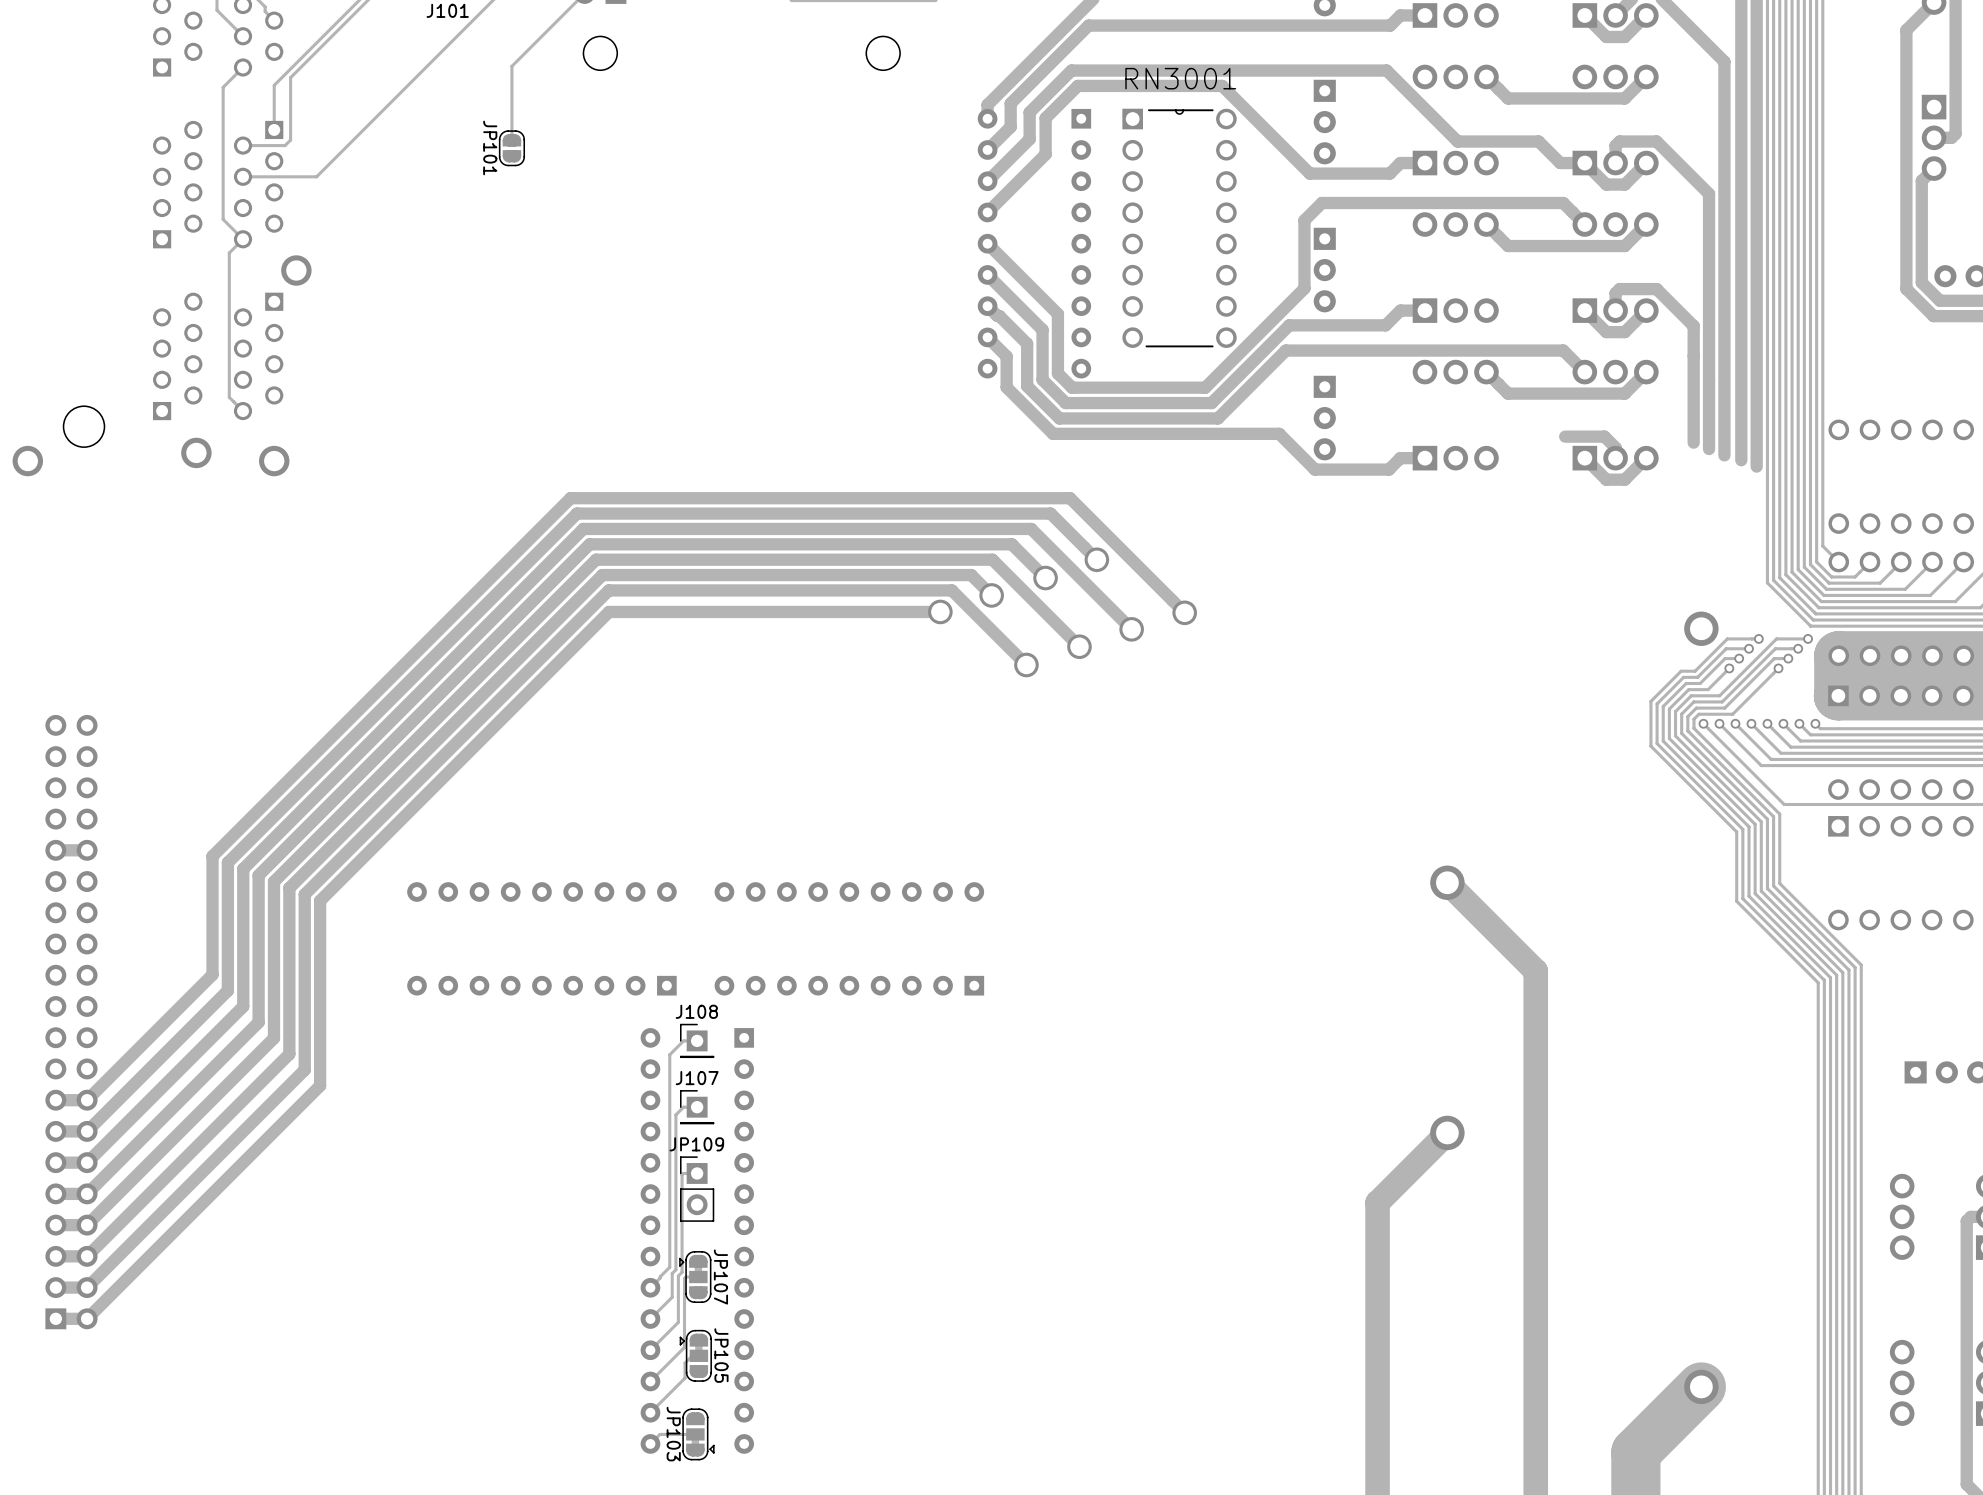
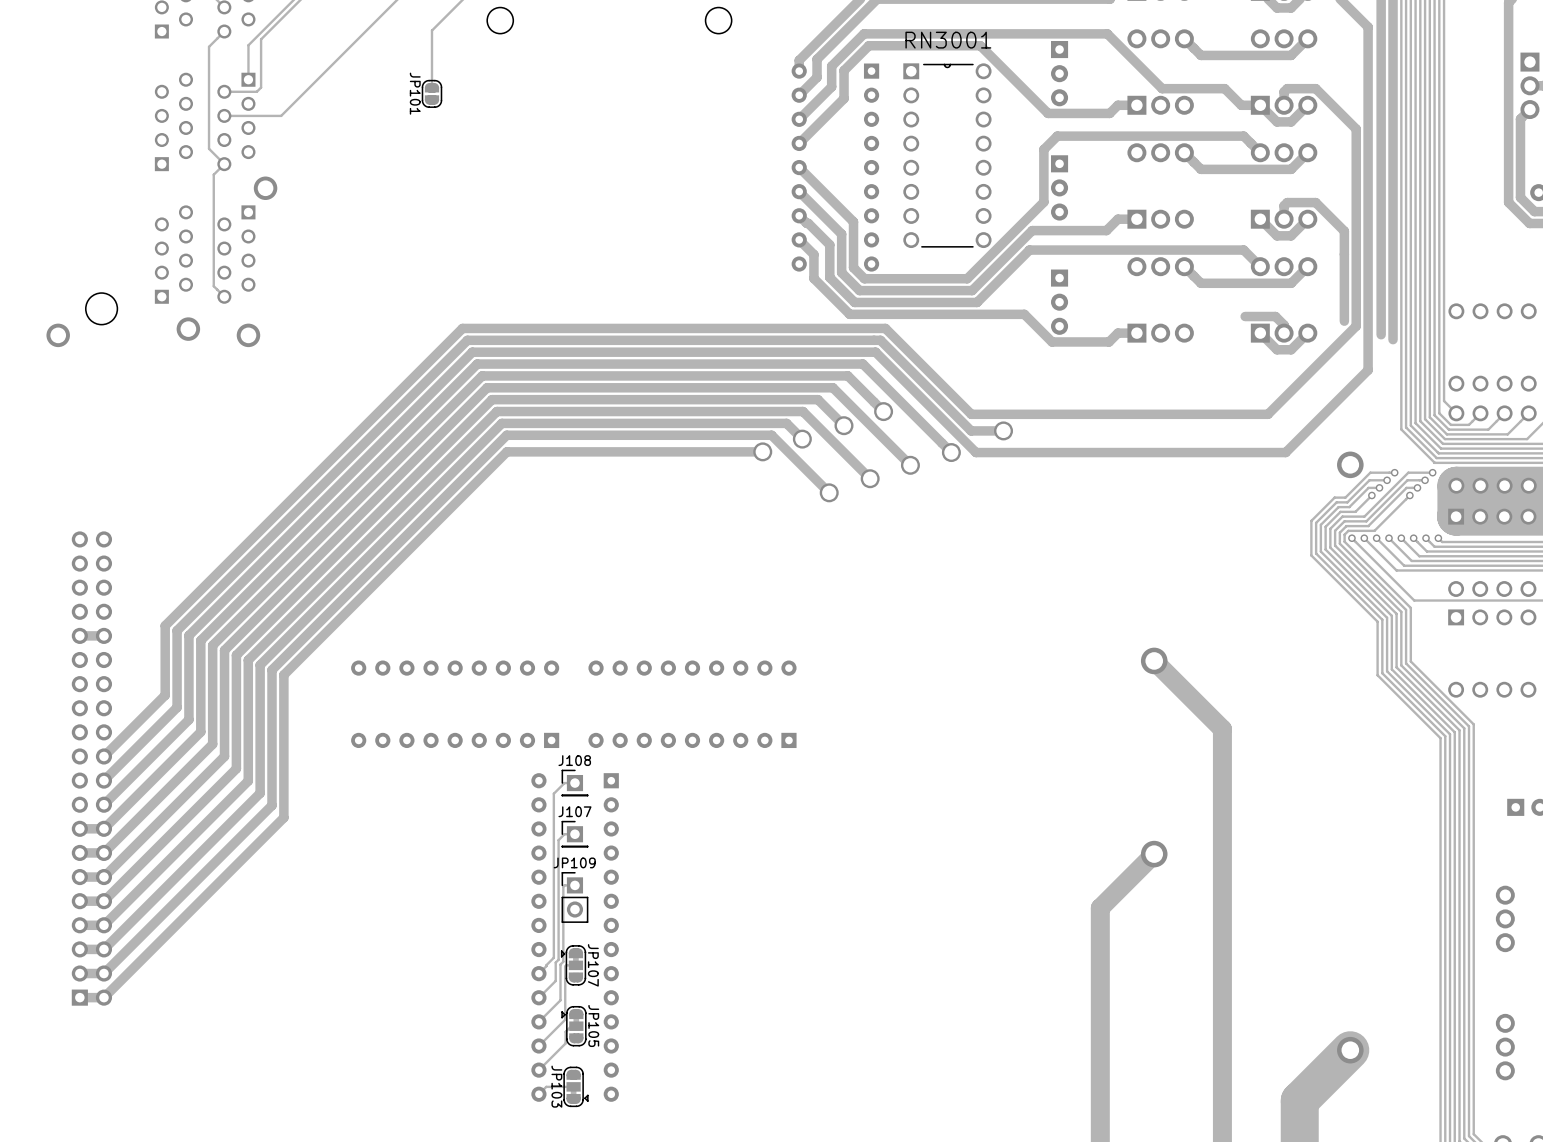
track: none -> (1356, 326) (1268, 414) (971, 414) (885, 328) (462, 328) (165, 625) (165, 695) (103, 756)
track: none -> (1368, 331) (1368, 370) (1285, 452) (975, 452) (875, 352) (472, 352) (188, 635) (188, 719) (103, 804)
via: none -> (1003, 430)
track: none -> (1004, 430) (971, 430) (880, 340) (467, 340) (177, 630) (177, 707) (103, 780)

